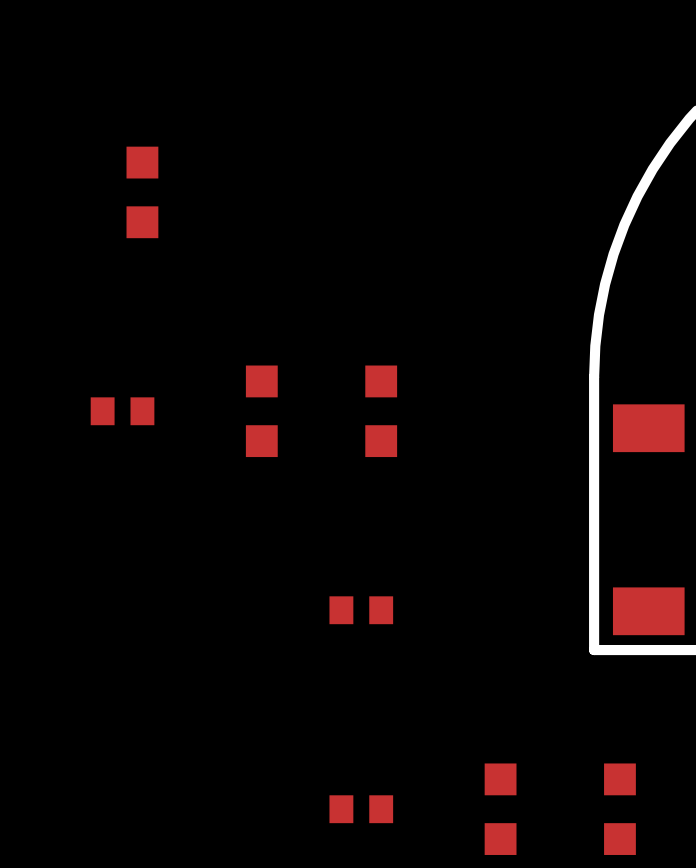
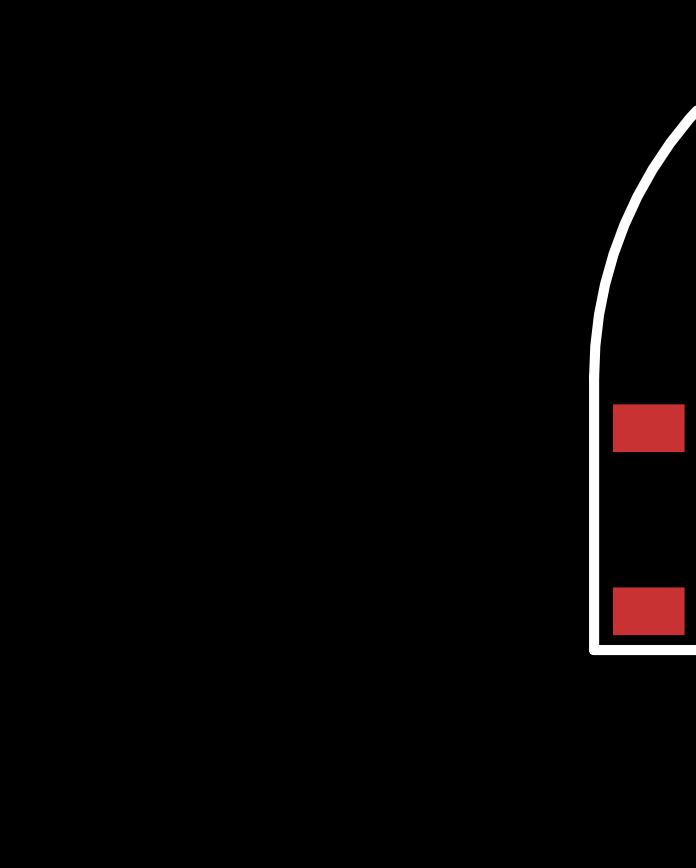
part: (142, 192) -> none
part: (122, 411) -> none
part: (261, 411) -> none
part: (381, 411) -> none
part: (361, 610) -> none
part: (361, 809) -> none
part: (500, 809) -> none
part: (619, 809) -> none

